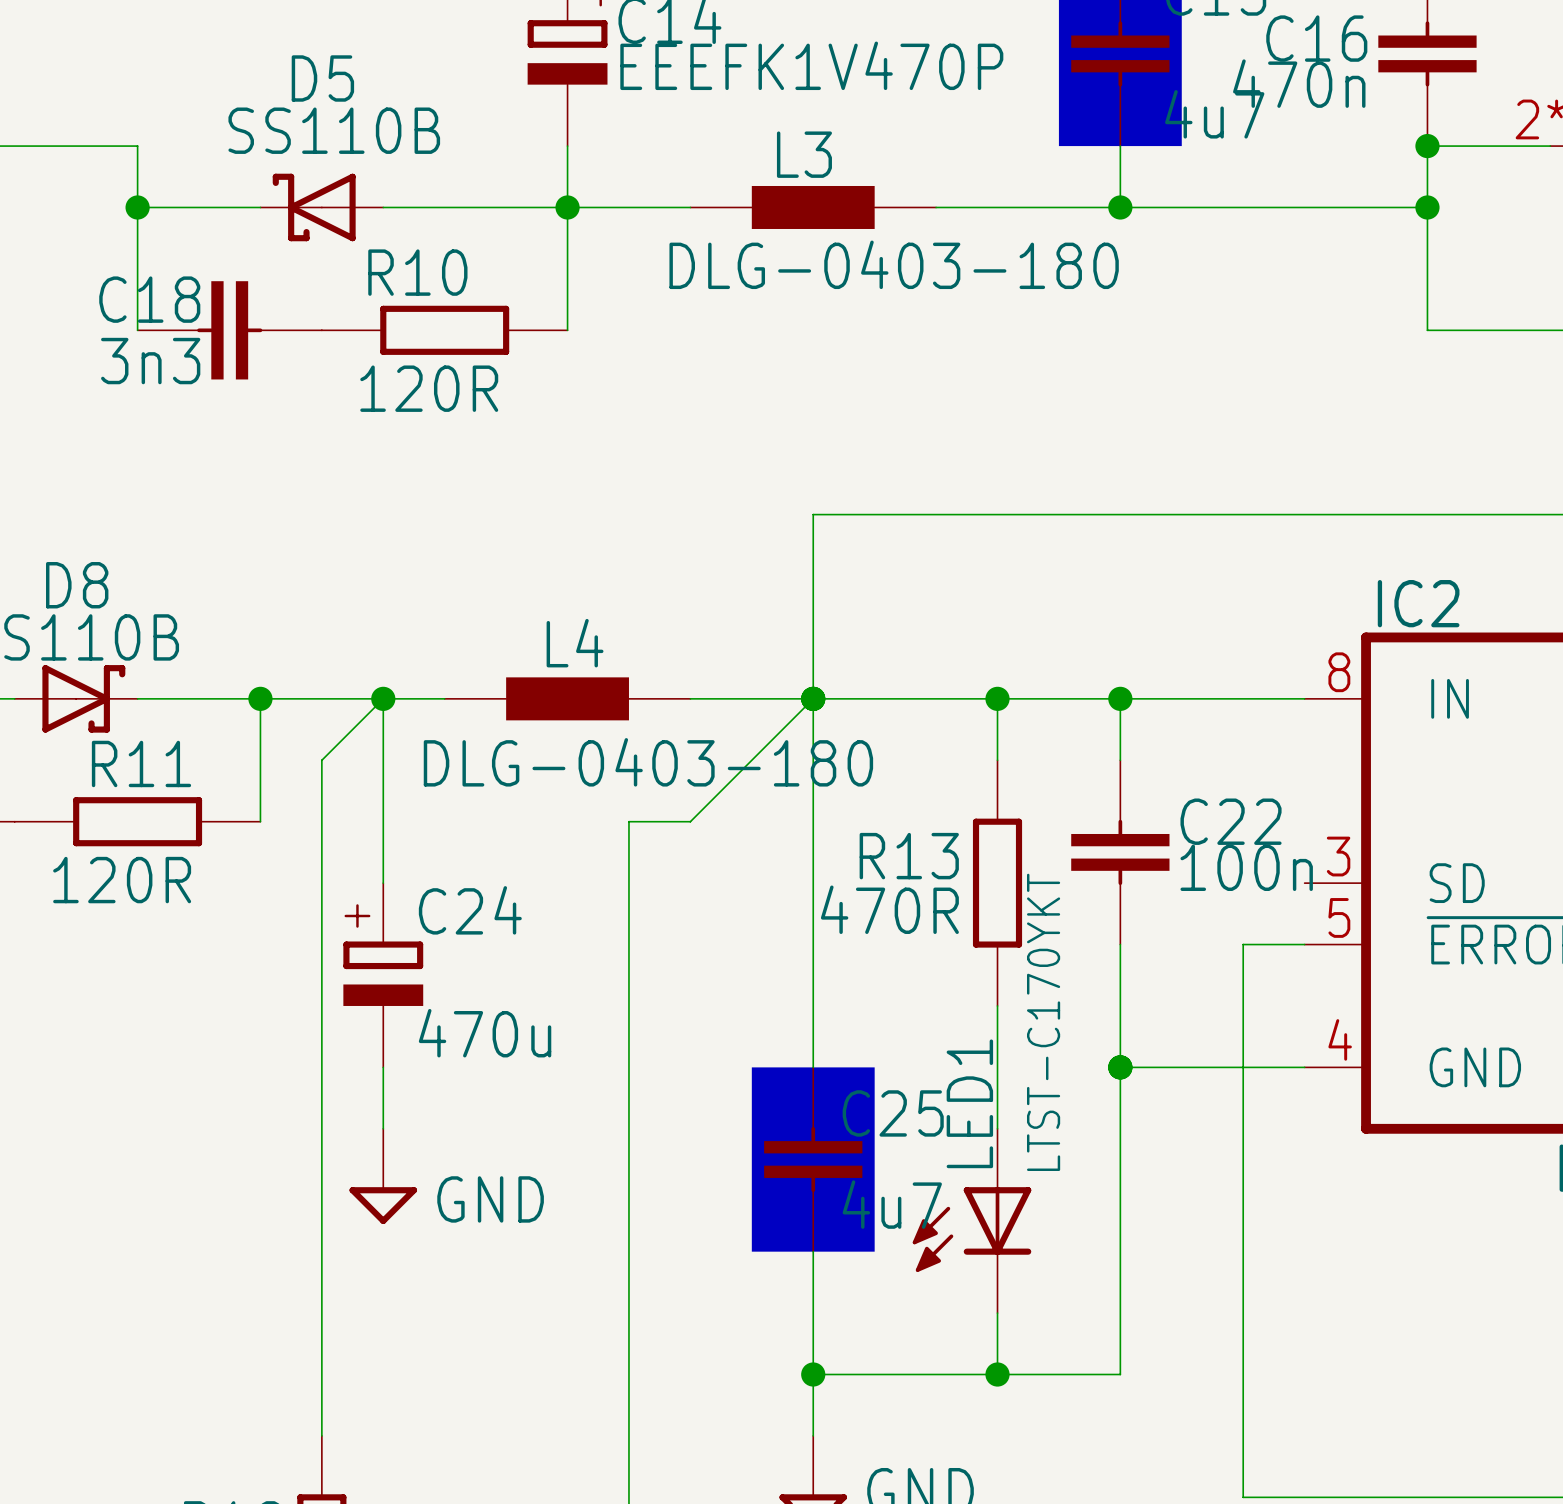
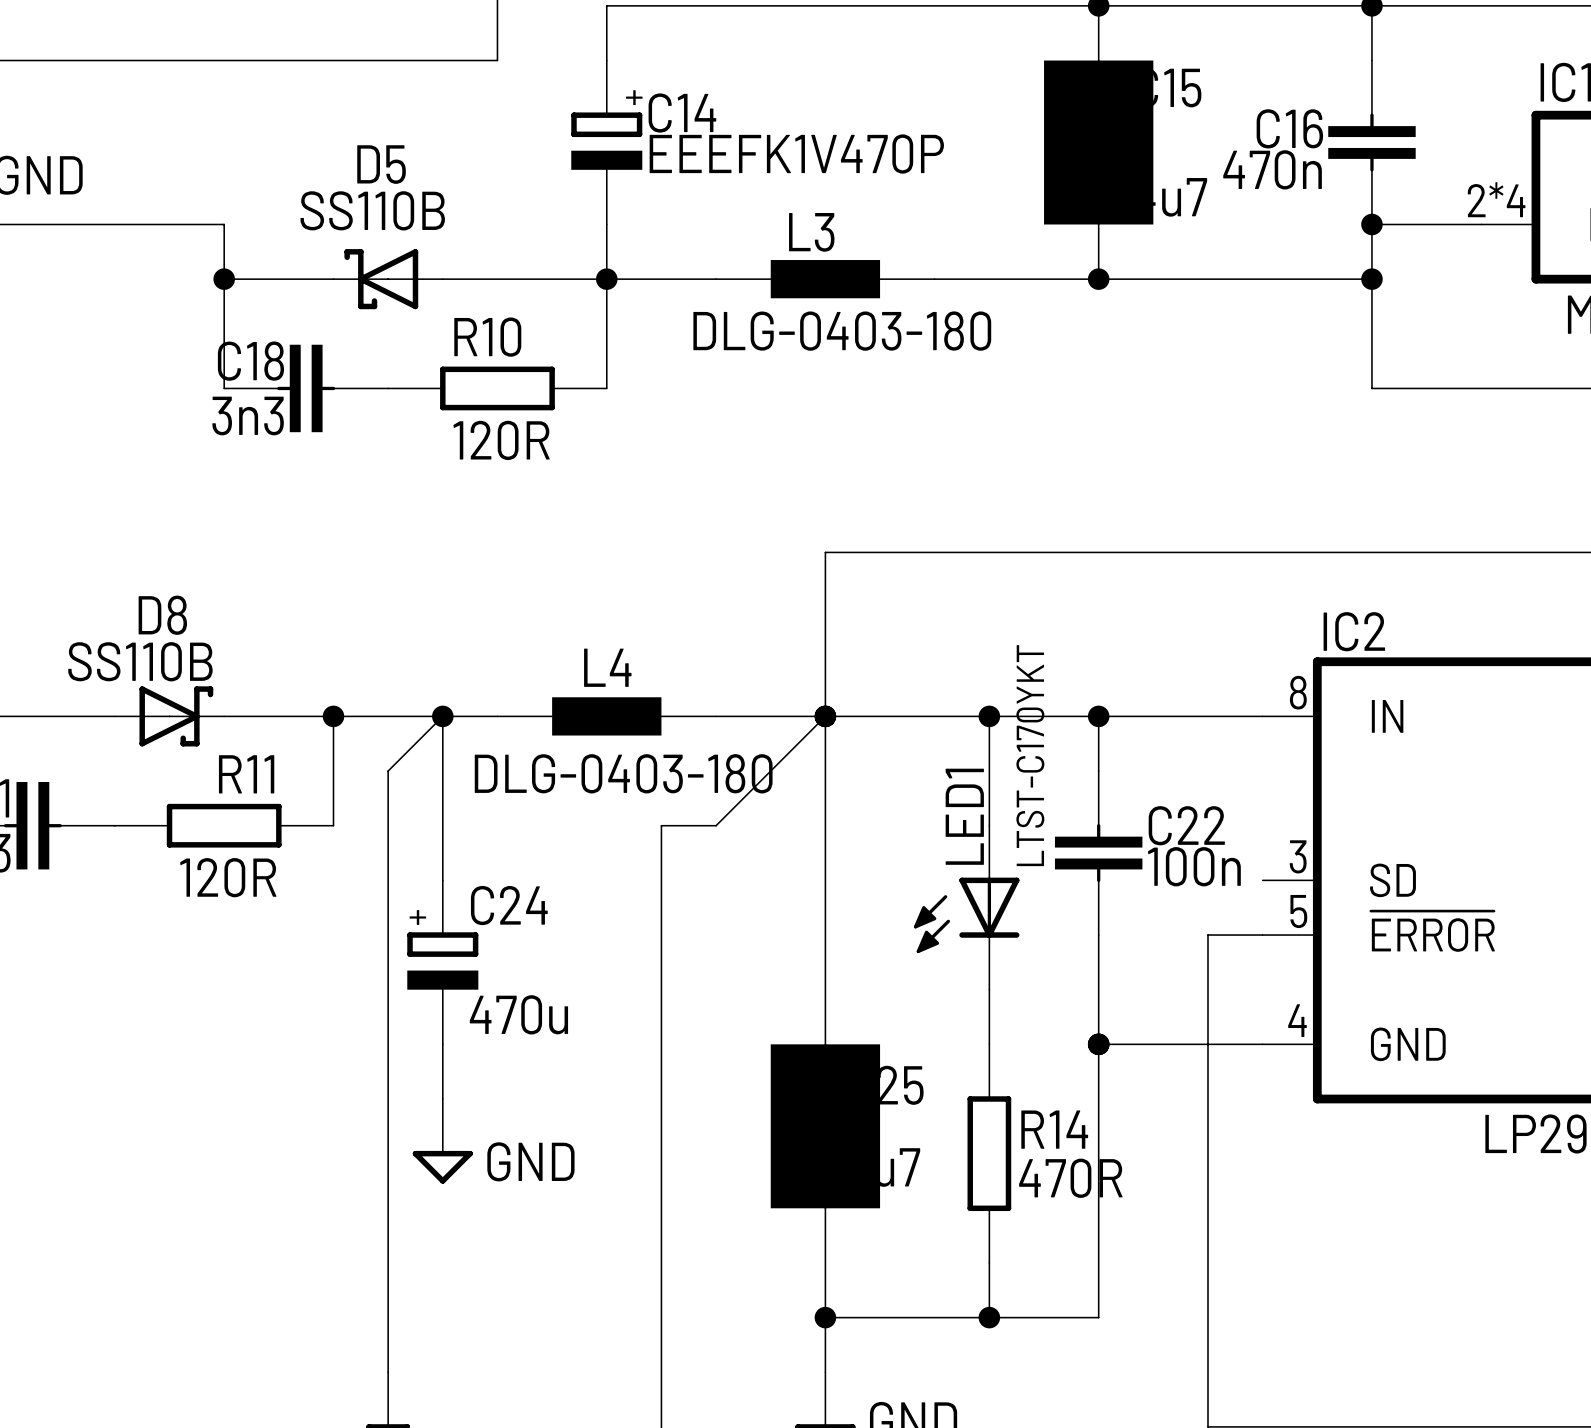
R13: 470R (997, 883) -> none
R14: none -> 470R (989, 1153)
LED1 position: (972, 1220) -> (966, 907)

